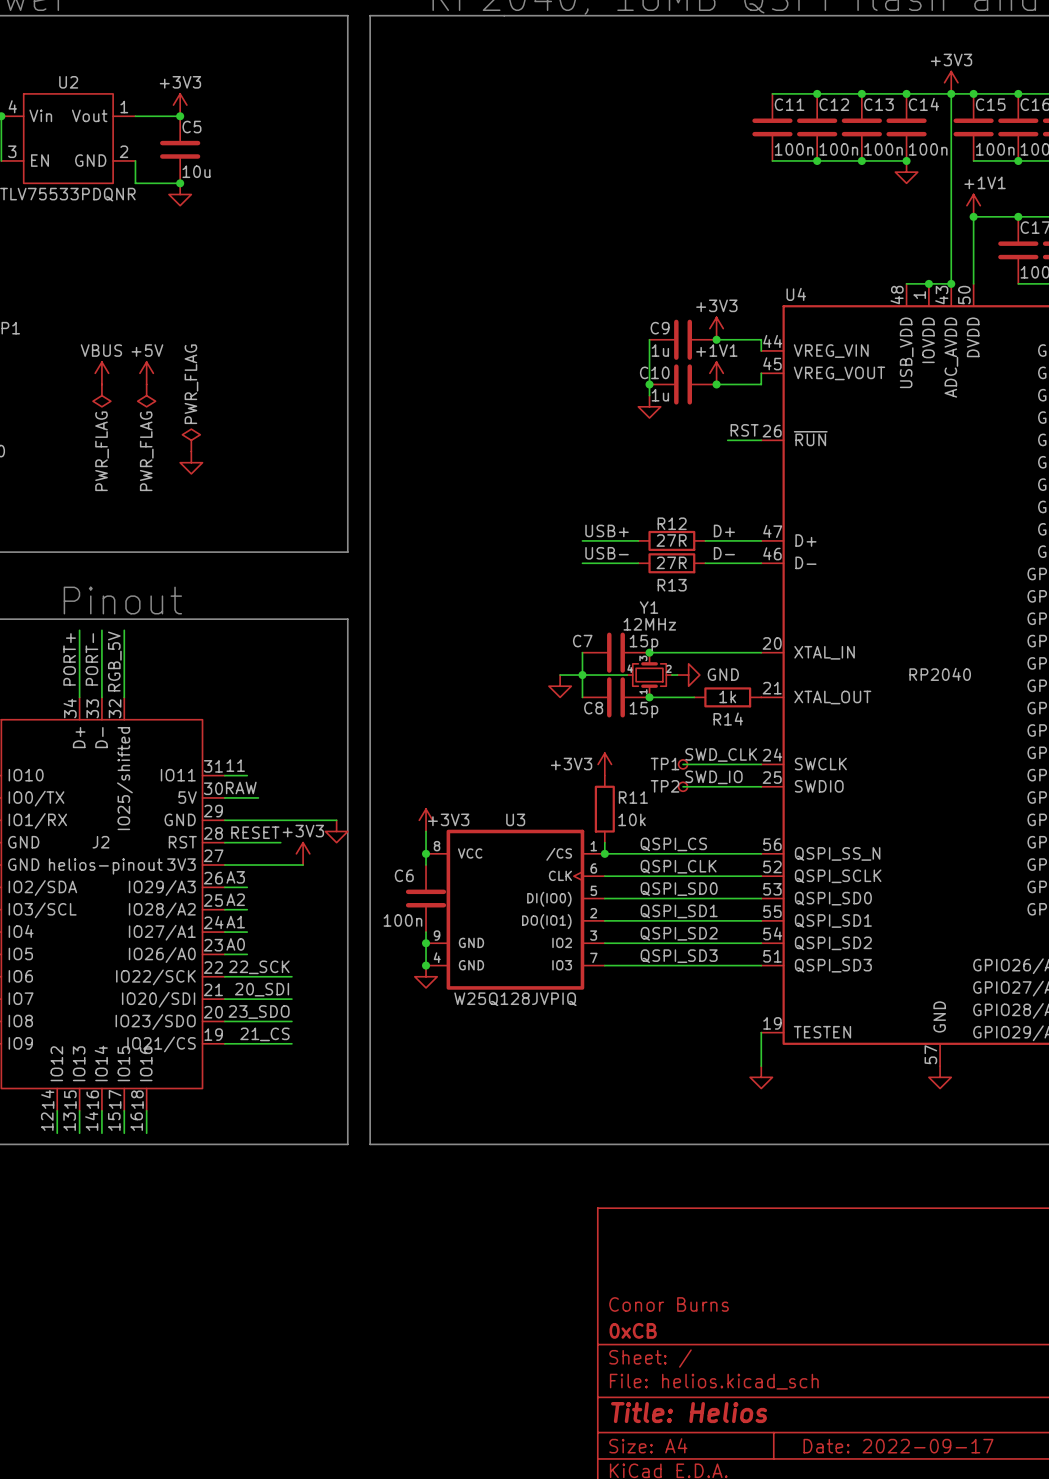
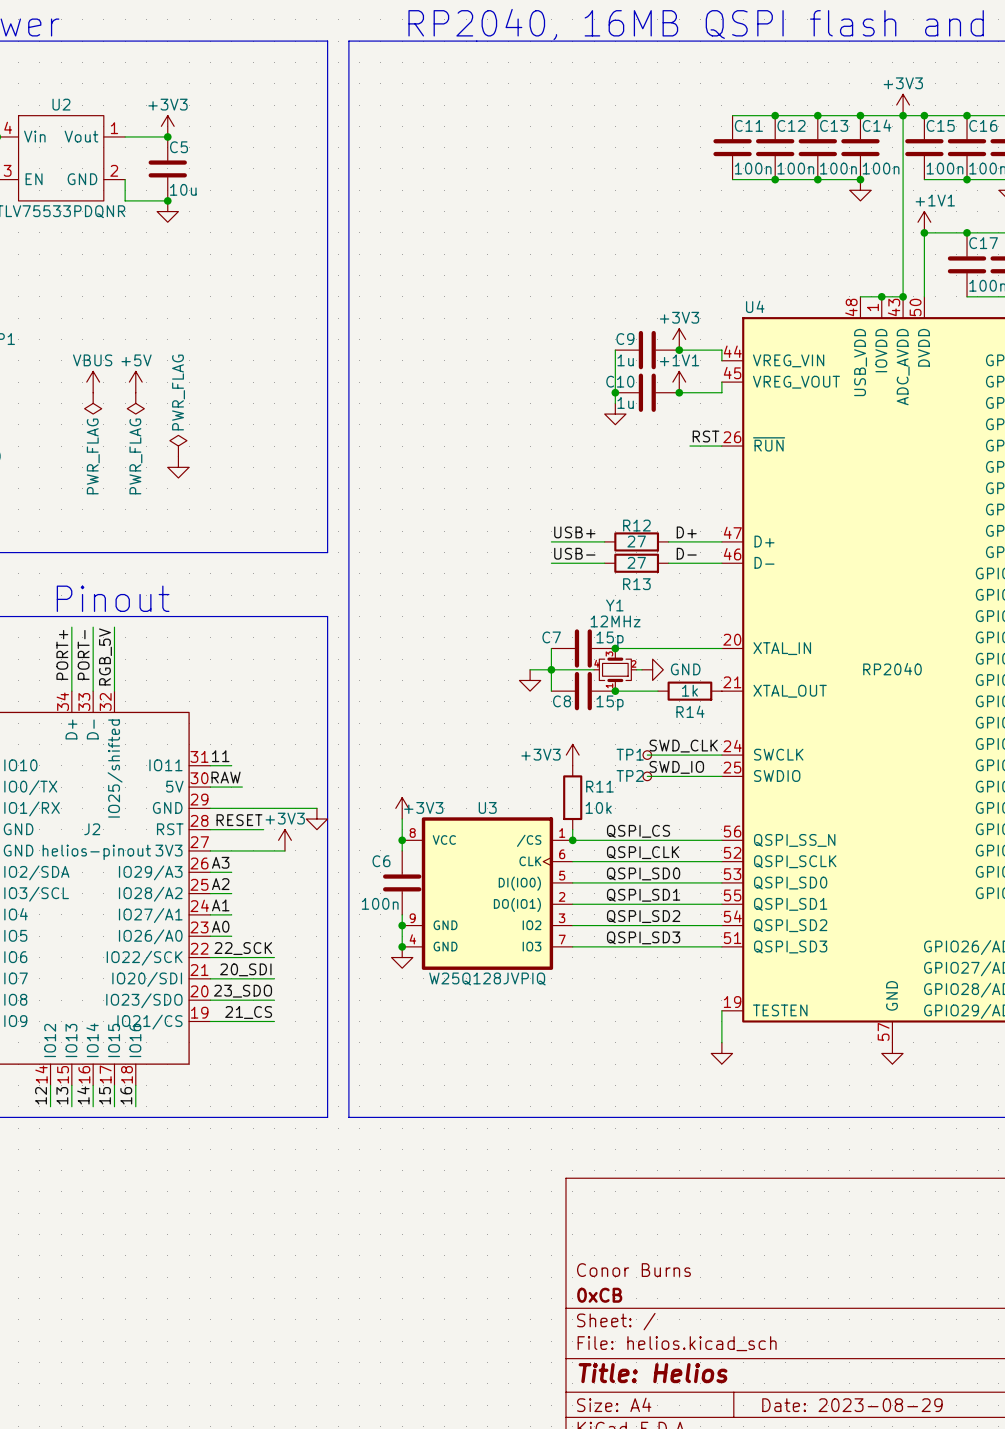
R12 value: 27R (671, 540) -> 27 (636, 541)
R13 value: 27R (671, 562) -> 27 (636, 562)
title block: Date: 2022-09-17 (898, 1446) -> Date: 2023-08-29 (852, 1405)

